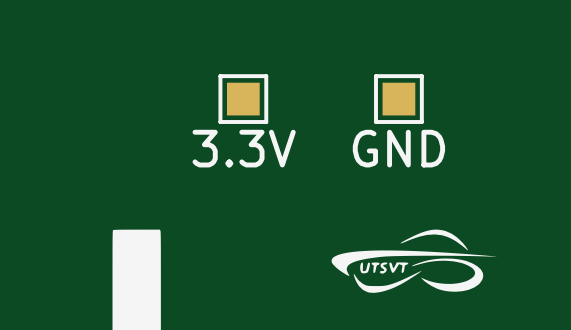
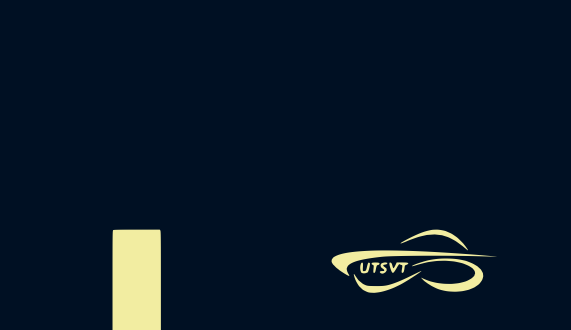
part: 3.3V (243, 99) -> none
part: GND (398, 99) -> none

